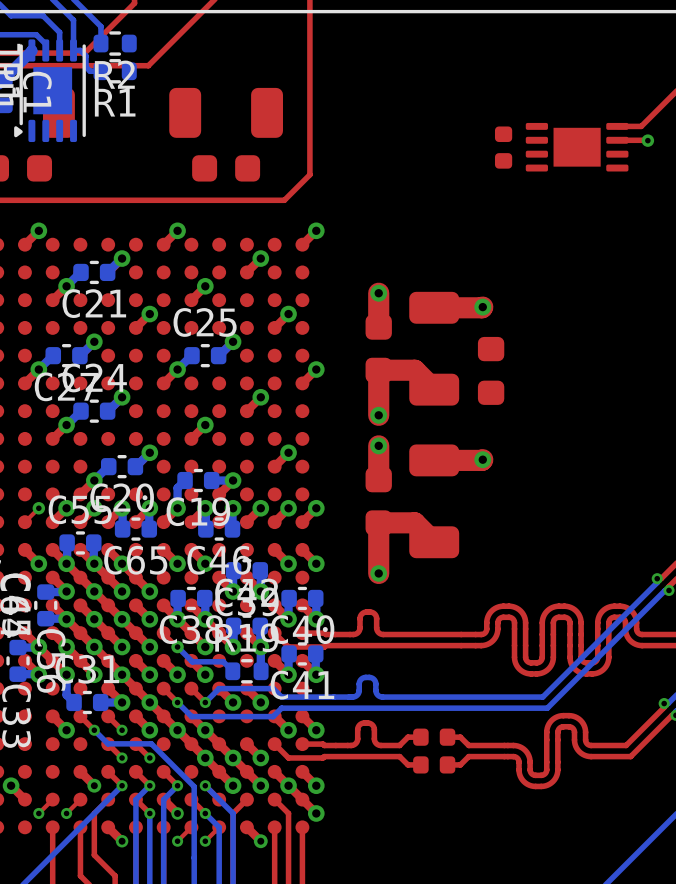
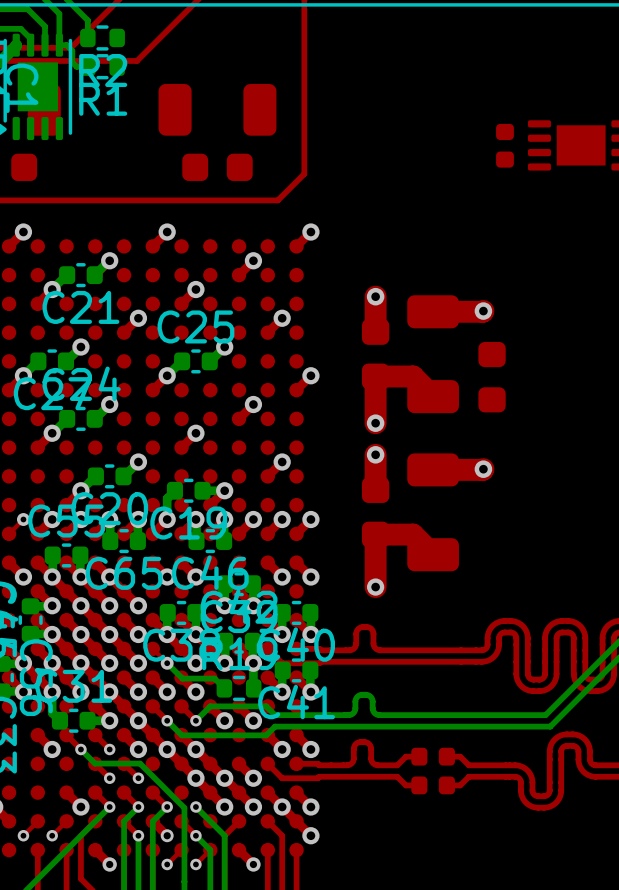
via position: (94, 785) -> (109, 864)
via: none -> (80, 806)
via: (122, 841) -> none

